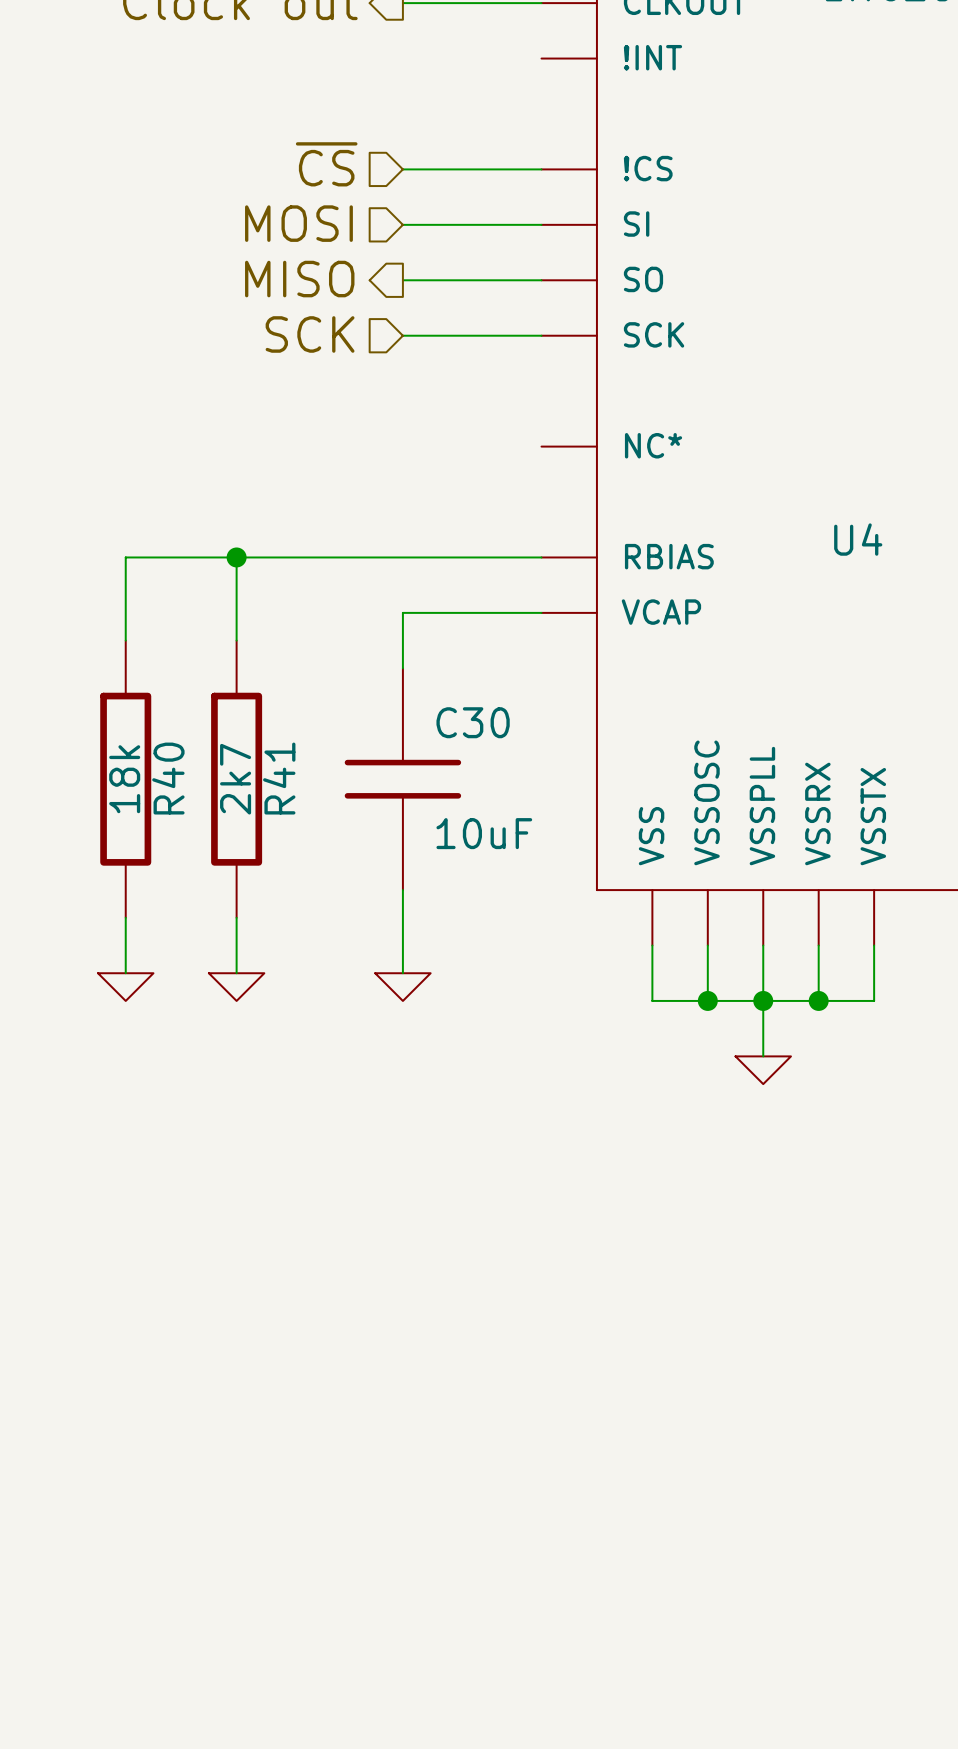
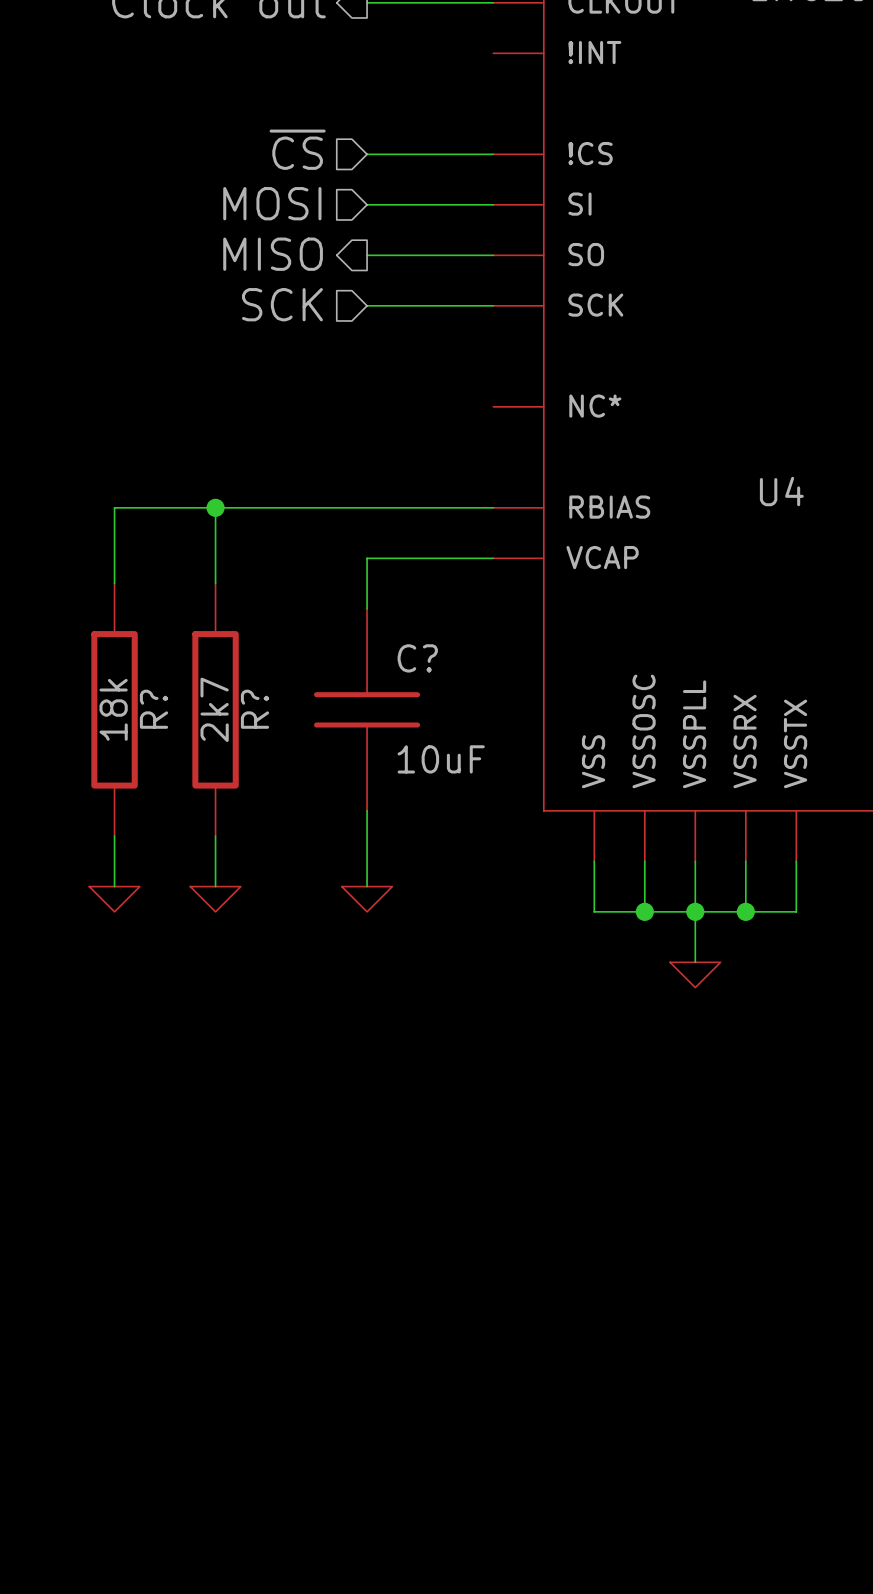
C30 name: C30 (473, 722) -> C? (417, 658)
R40 name: R40 (168, 778) -> R? (154, 709)
R41 name: R41 (279, 778) -> R? (255, 709)

